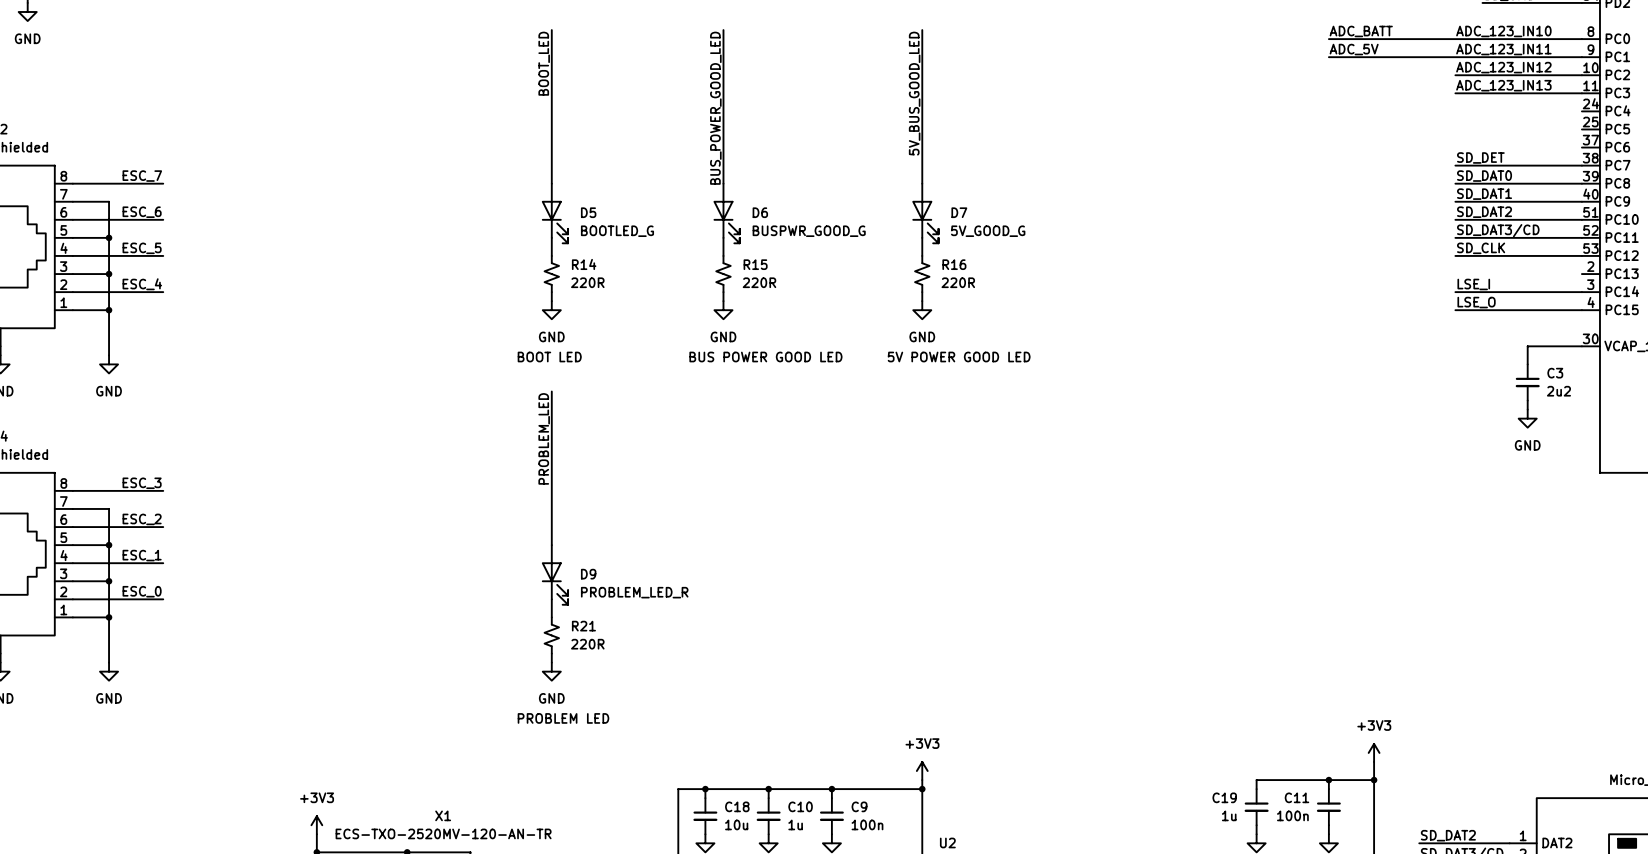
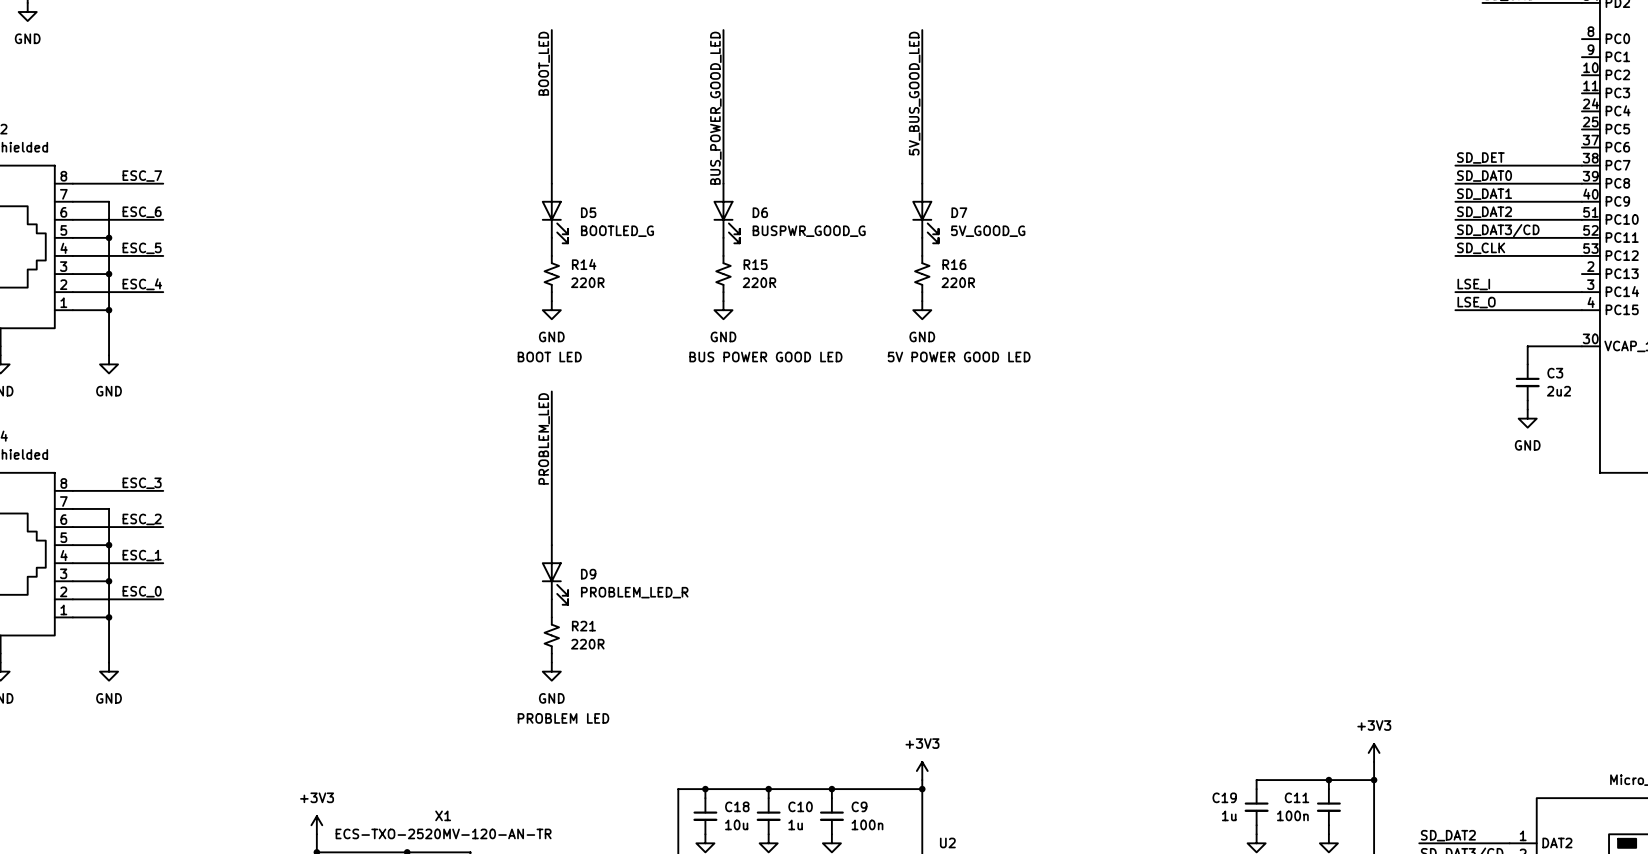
label: ADC_BATT (1361, 31) -> none
label: ADC_123_IN10 (1503, 31) -> none
wire: (1328, 39) (1581, 39) -> none
label: ADC_5V (1354, 49) -> none
label: ADC_123_IN11 (1503, 49) -> none
wire: (1328, 57) (1581, 57) -> none
label: ADC_123_IN12 (1503, 67) -> none
wire: (1455, 75) (1581, 75) -> none
label: ADC_123_IN13 (1503, 85) -> none
wire: (1455, 93) (1581, 93) -> none

